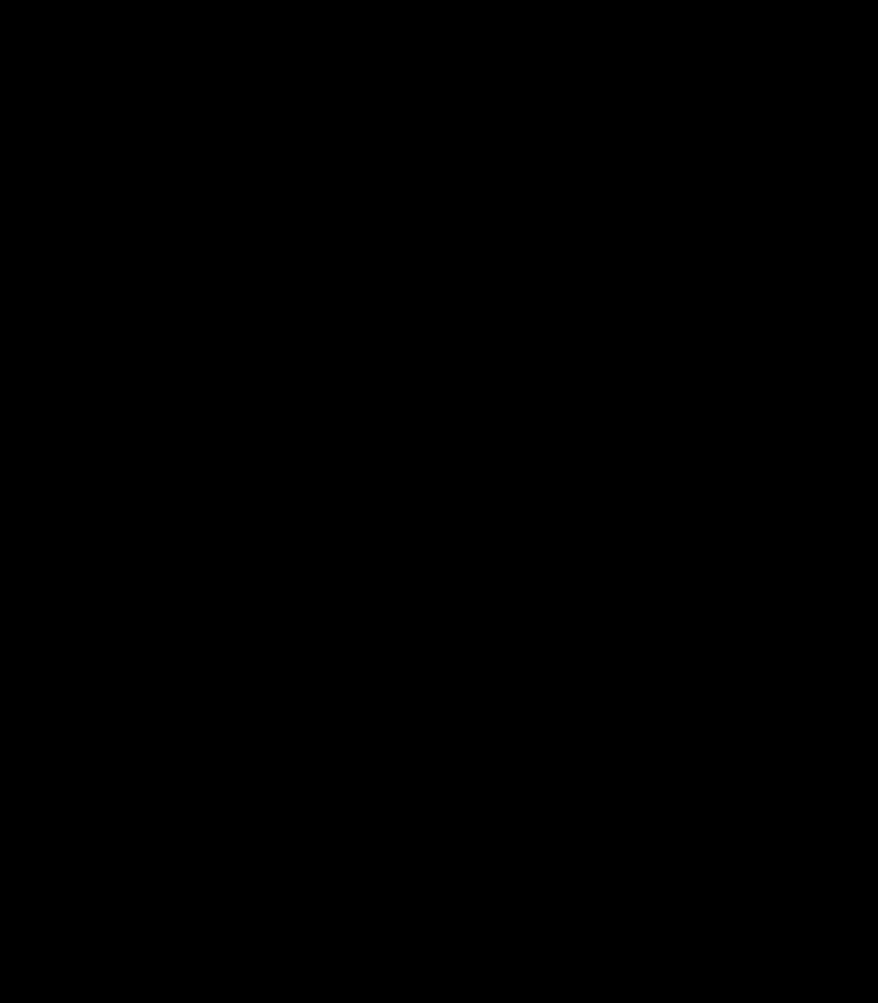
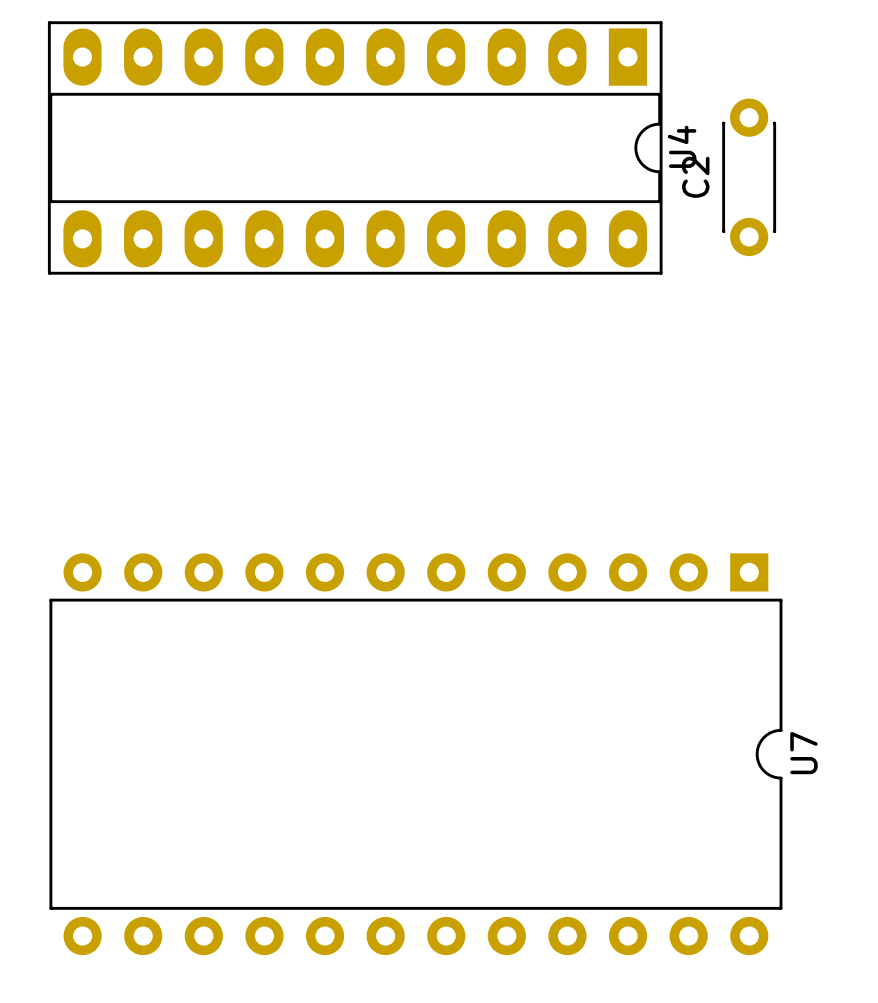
U4: none -> (355, 147)
C2: none -> (749, 177)
U7: none -> (415, 754)

